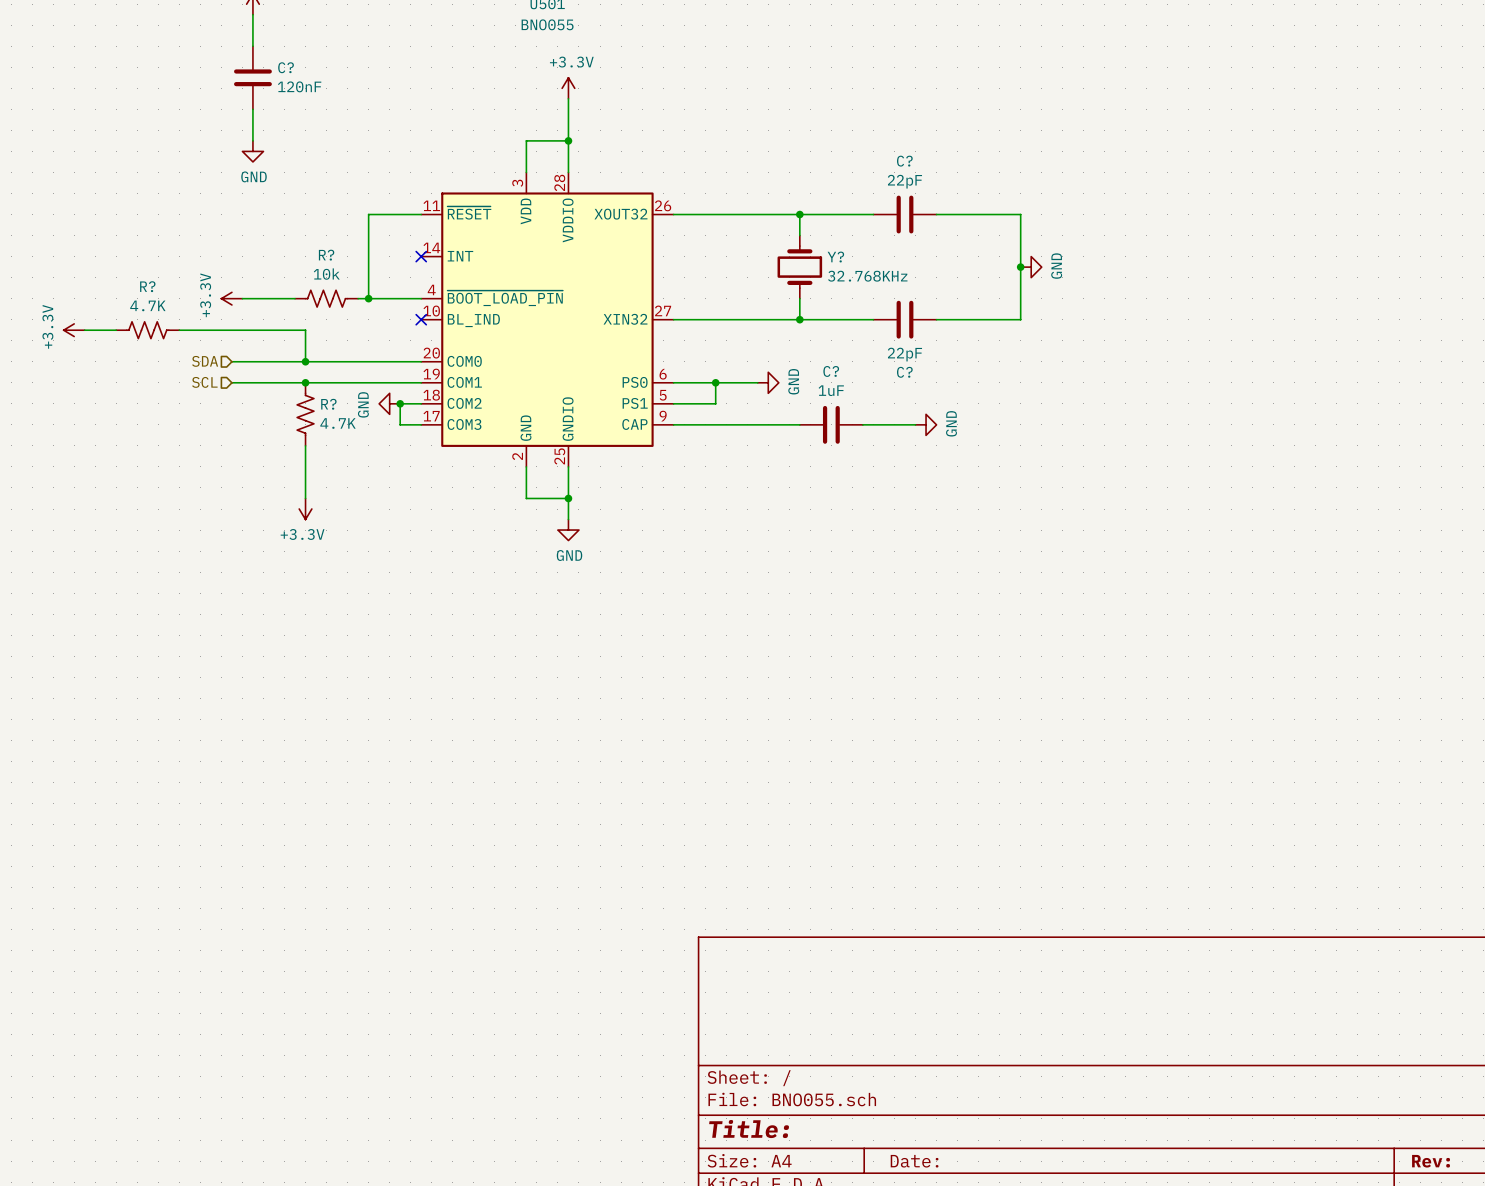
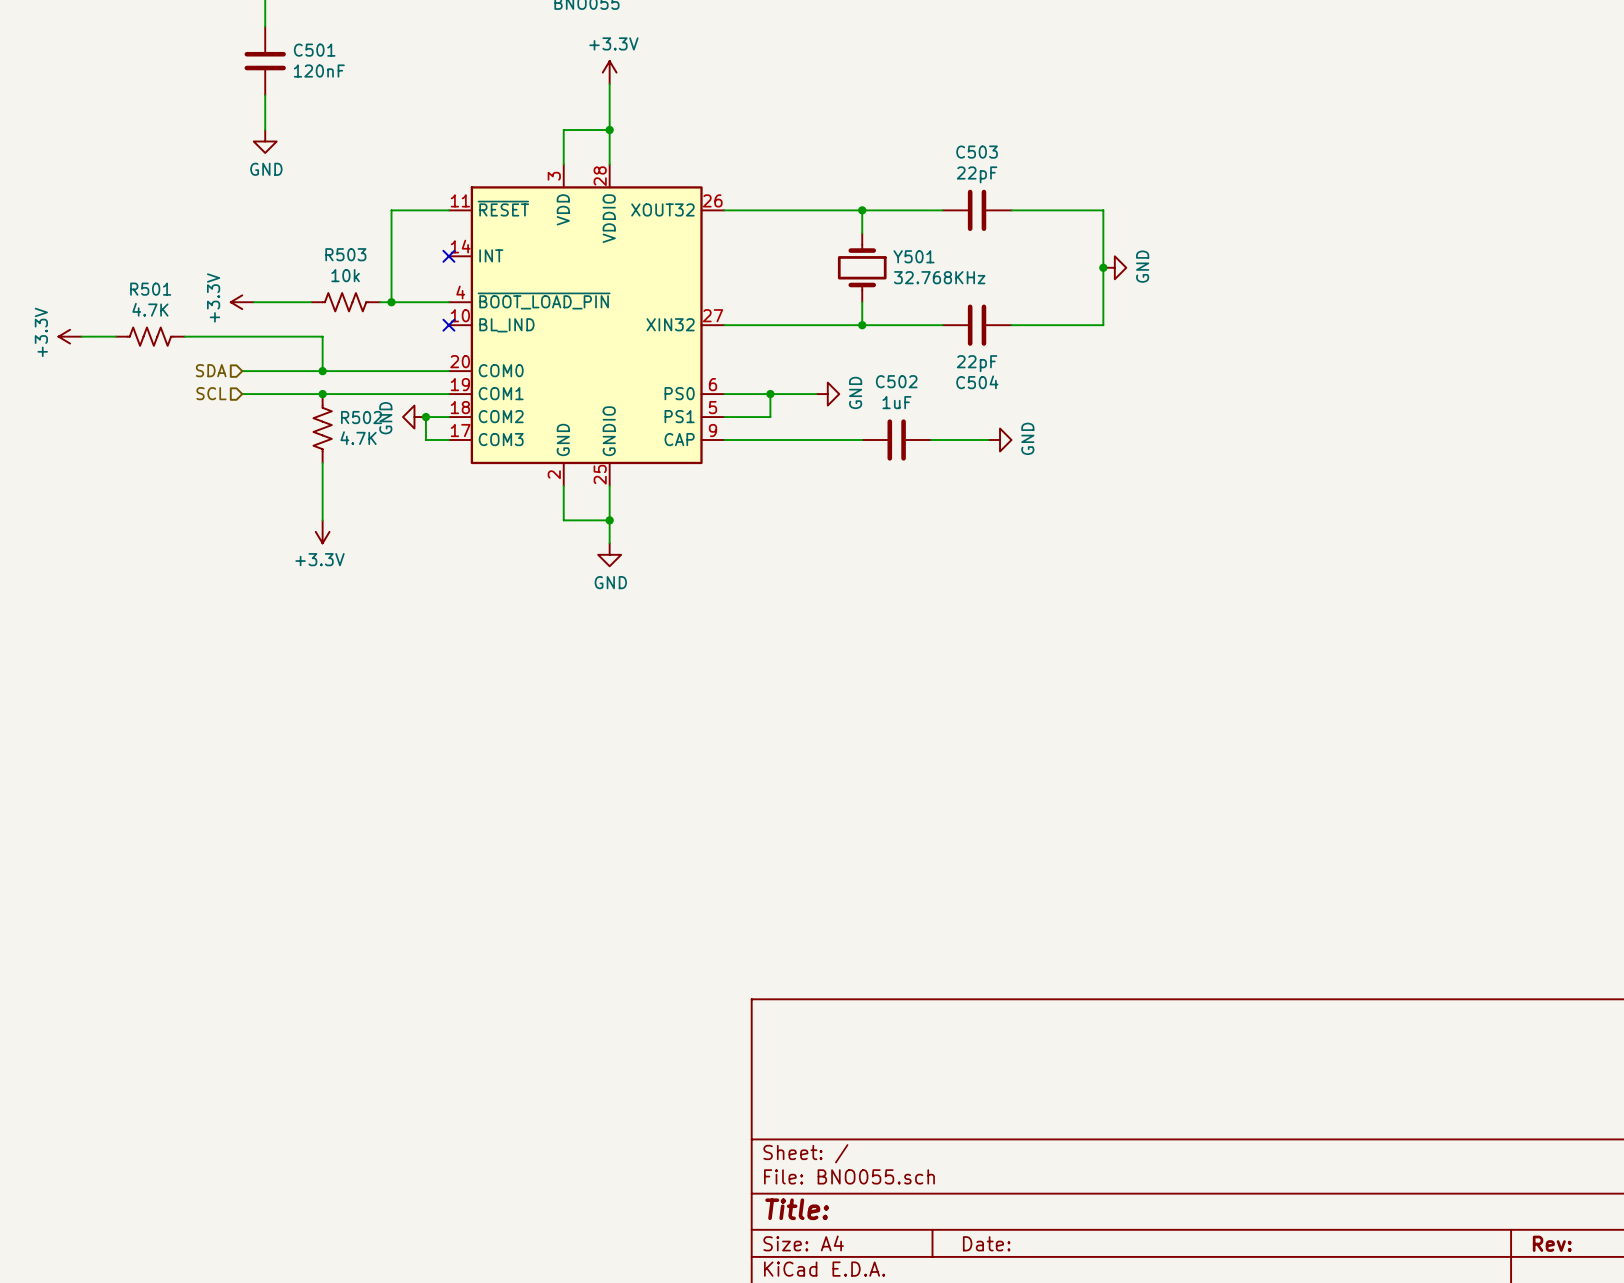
C? name: C? (286, 67) -> C501 (314, 50)
C? name: C? (904, 161) -> C503 (977, 152)
R? name: R? (326, 255) -> R503 (345, 254)
Y? name: Y? (835, 257) -> Y501 (914, 256)
R? name: R? (147, 286) -> R501 (150, 289)
C? name: C? (831, 371) -> C502 (896, 381)
C? name: C? (904, 372) -> C504 (977, 382)
R? name: R? (328, 404) -> R502 (361, 417)

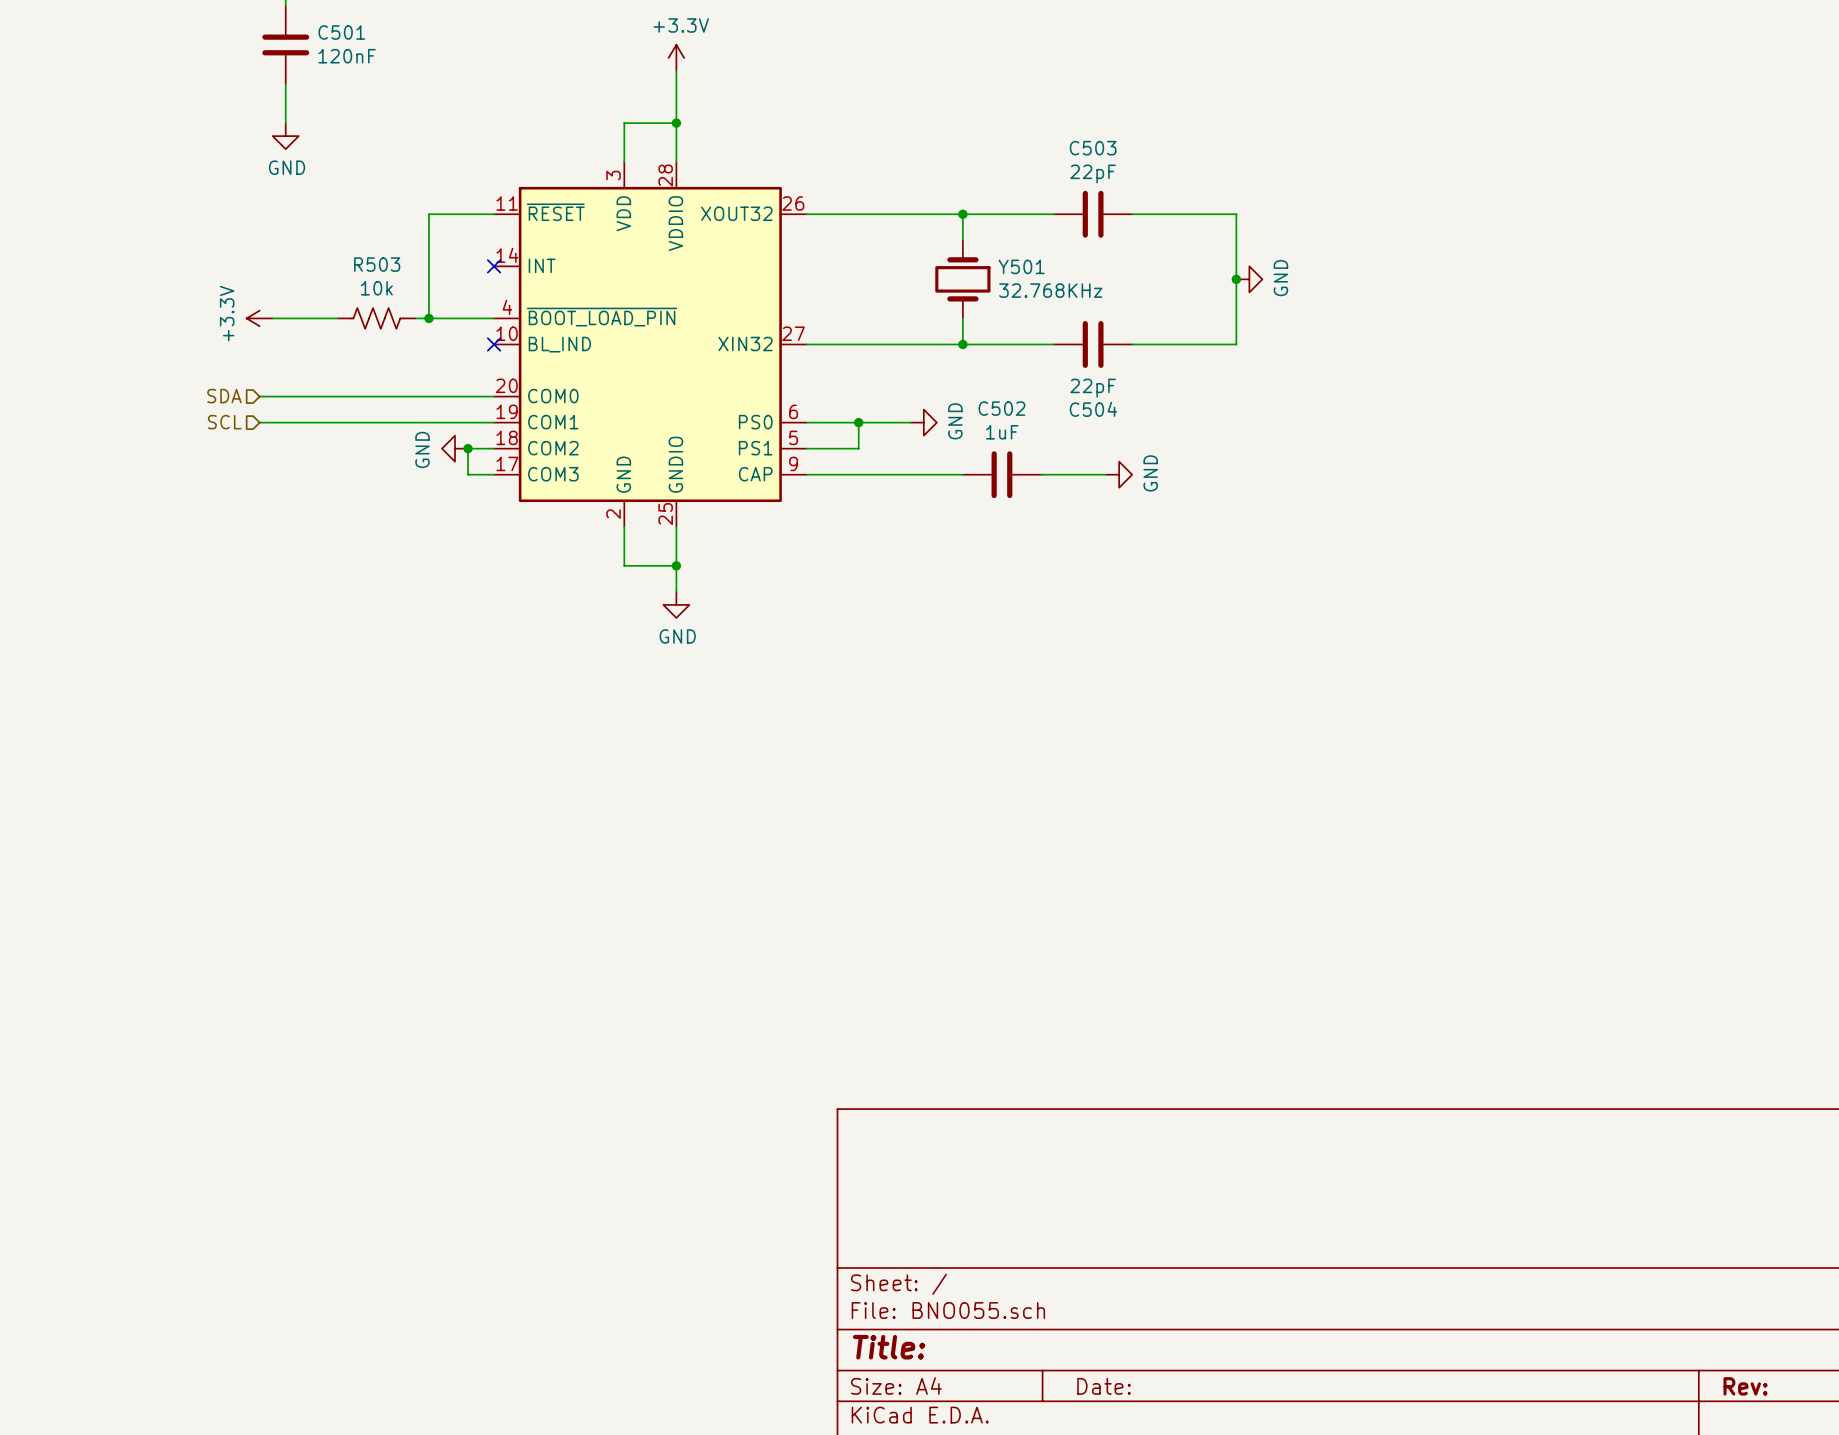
power symbol: +3.3V (70, 336) -> none
wire: (81, 336) (115, 336) -> none
R501: 4.7K (150, 336) -> none
wire: (184, 336) (322, 336) (322, 371) -> none
junction: (322, 371) -> none
junction: (322, 394) -> none
R502: 4.7K (322, 428) -> none
wire: (322, 462) (322, 520) -> none
power symbol: +3.3V (322, 531) -> none

